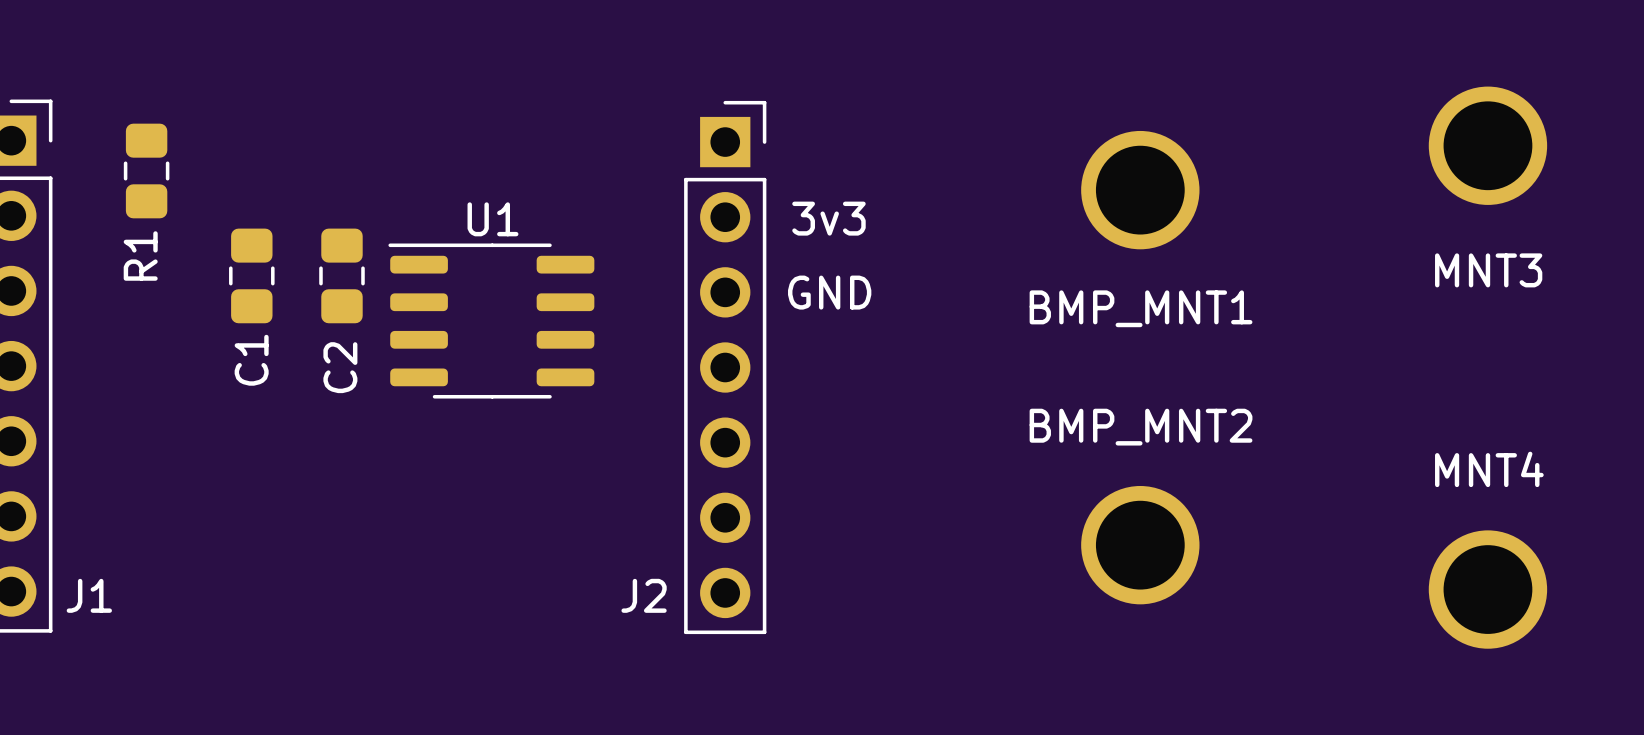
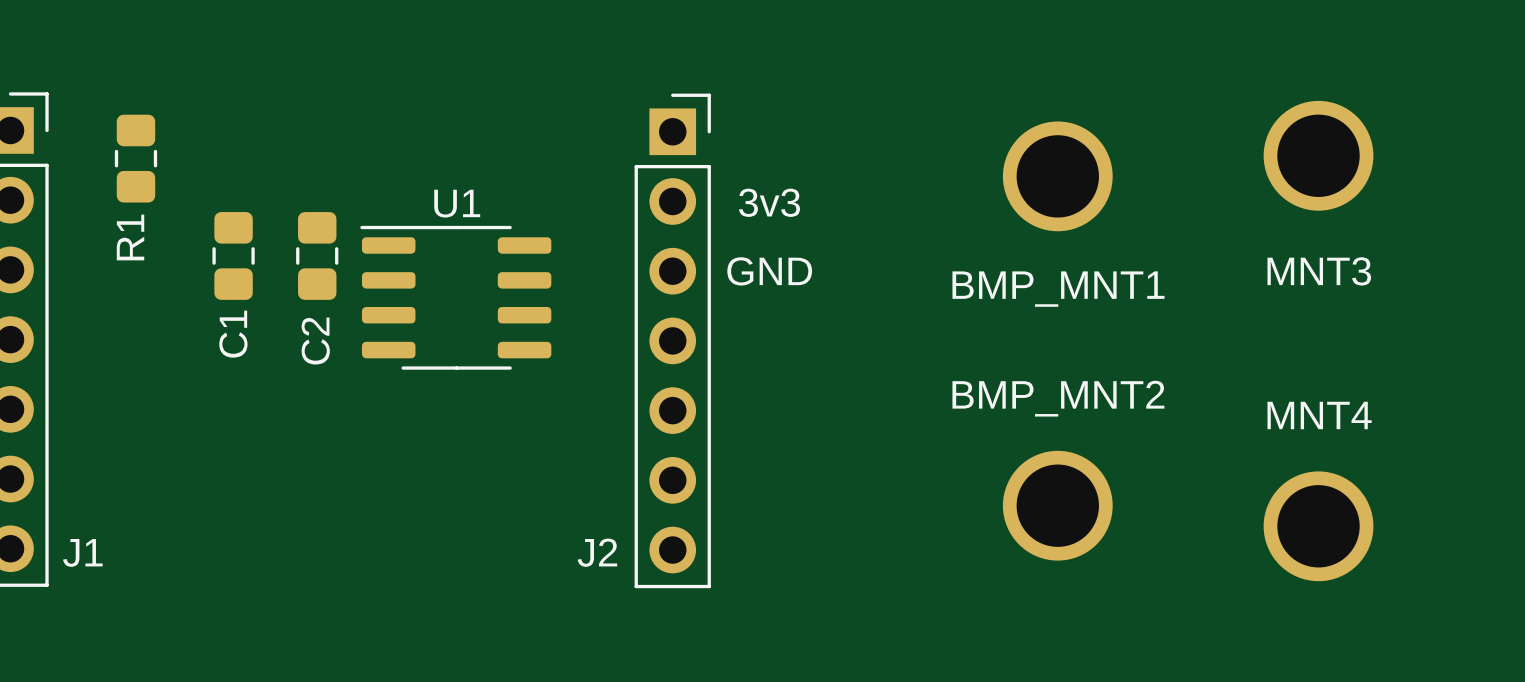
MNT3 position: (1487, 145) -> (1318, 155)
MNT4 position: (1487, 589) -> (1318, 526)

